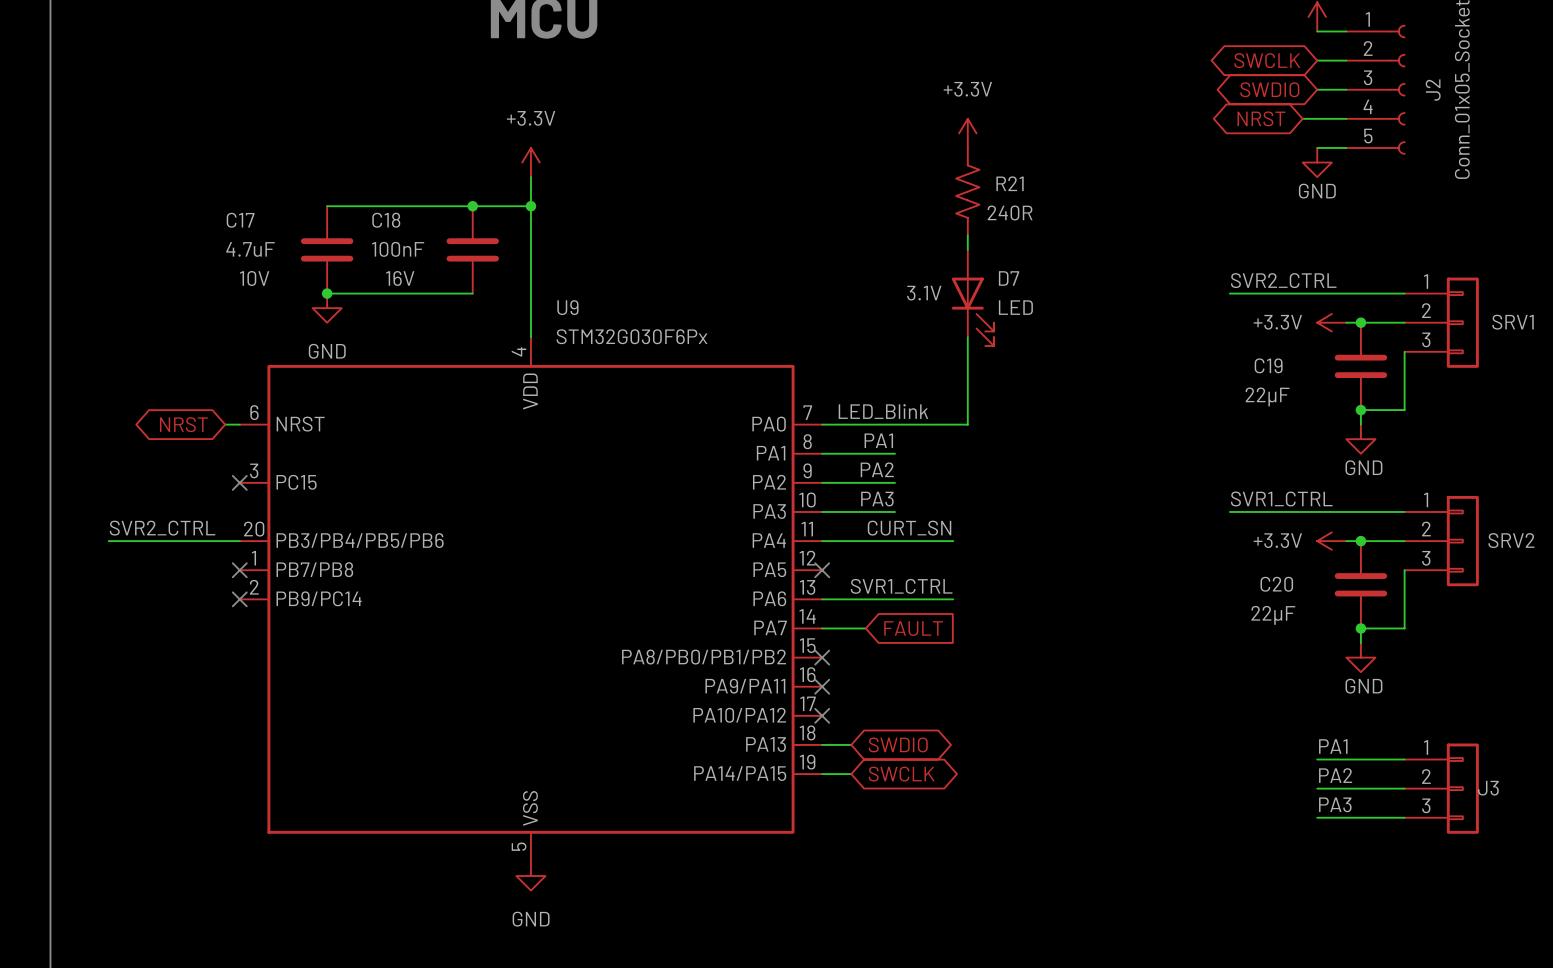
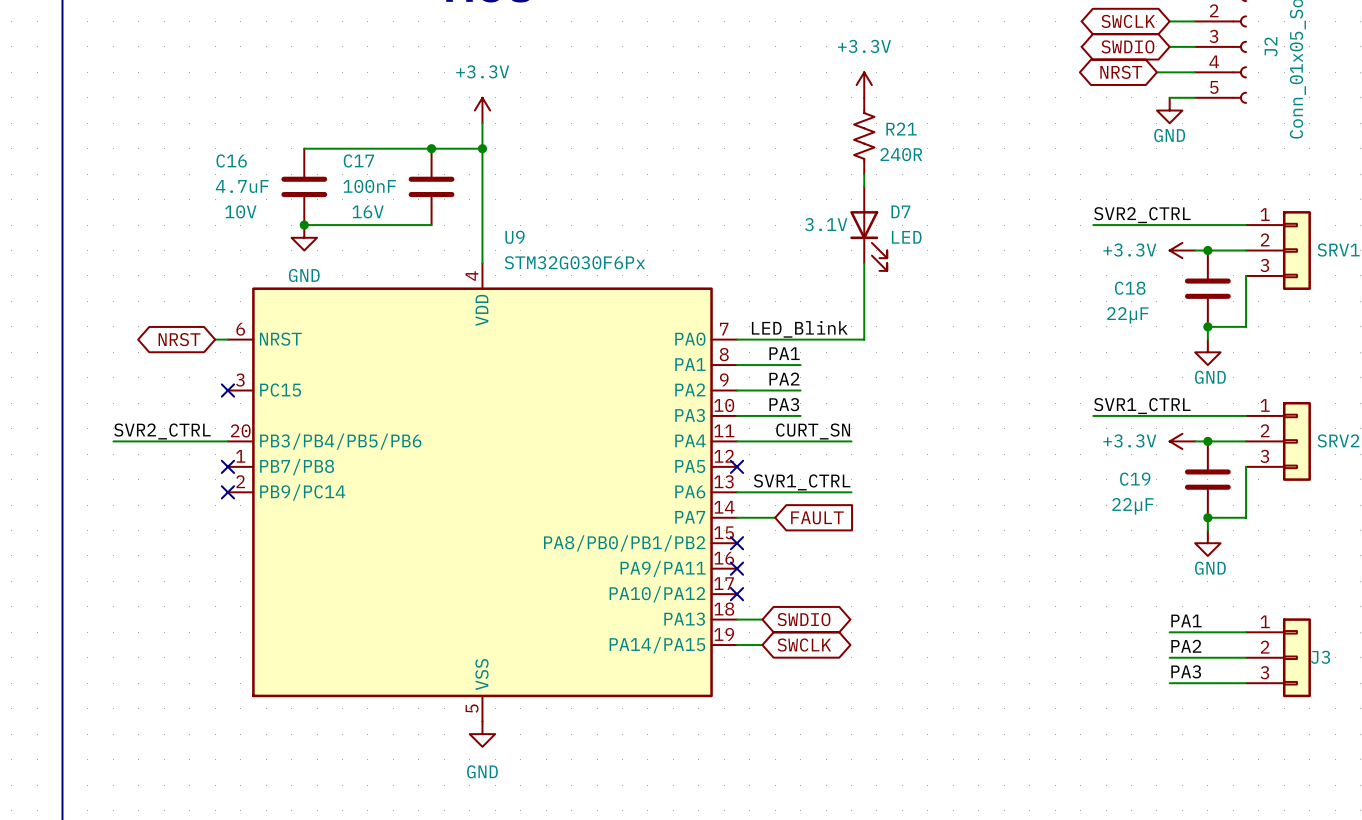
C17 name: C17 (240, 220) -> C16 (231, 160)
C18 name: C18 (386, 220) -> C17 (358, 160)
C19 name: C19 (1268, 365) -> C18 (1130, 288)
C20 name: C20 (1276, 584) -> C19 (1135, 479)

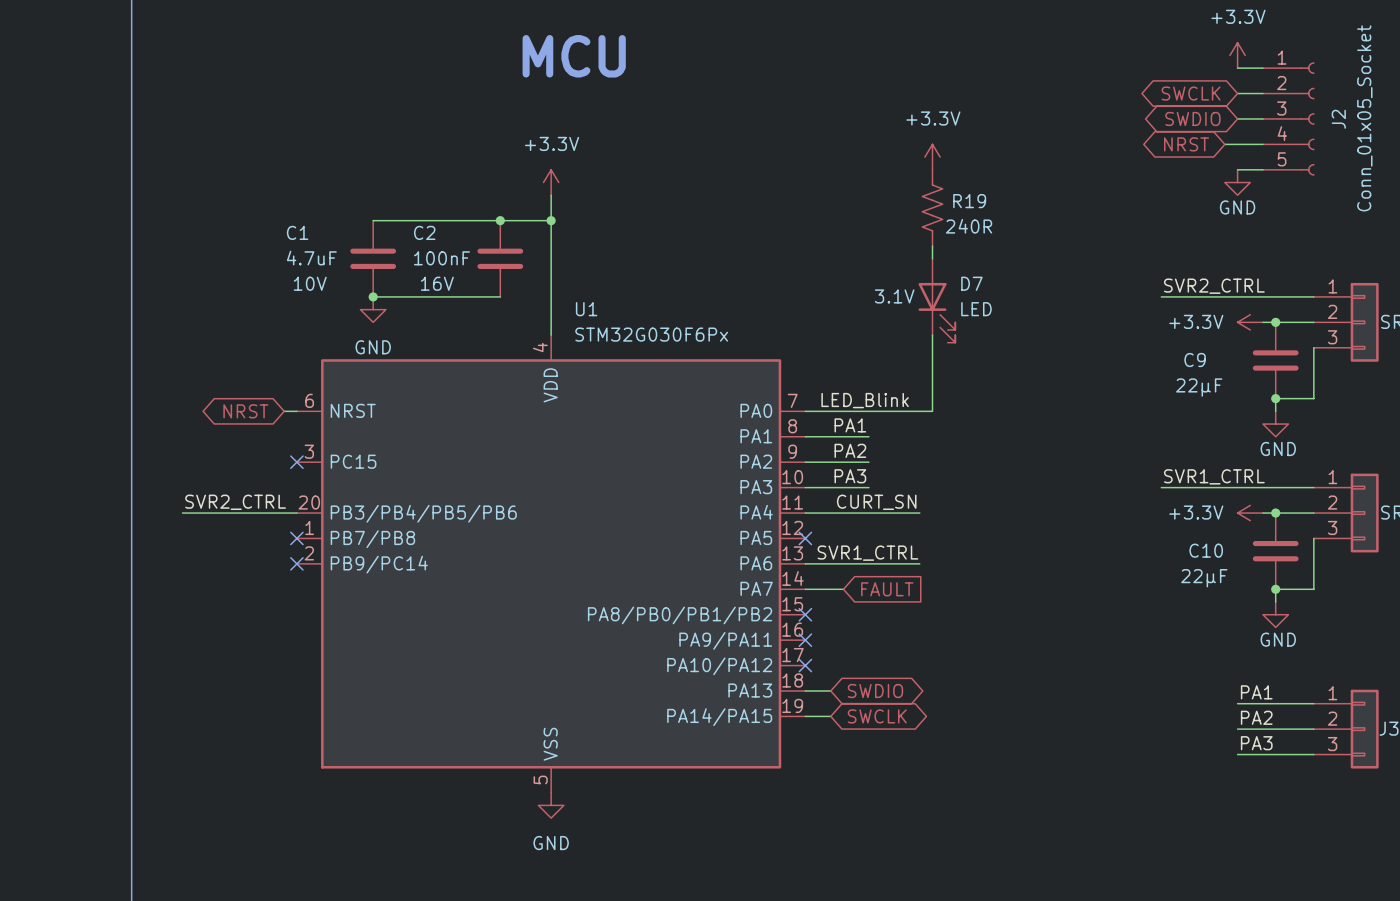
R21 name: R21 (901, 129) -> R19 (969, 201)
C16 name: C16 (231, 160) -> C1 (297, 232)
C17 name: C17 (358, 160) -> C2 (424, 232)
U9 name: U9 (515, 237) -> U1 (586, 309)
C18 name: C18 (1130, 288) -> C9 (1195, 360)
C19 name: C19 (1135, 479) -> C10 (1206, 550)

